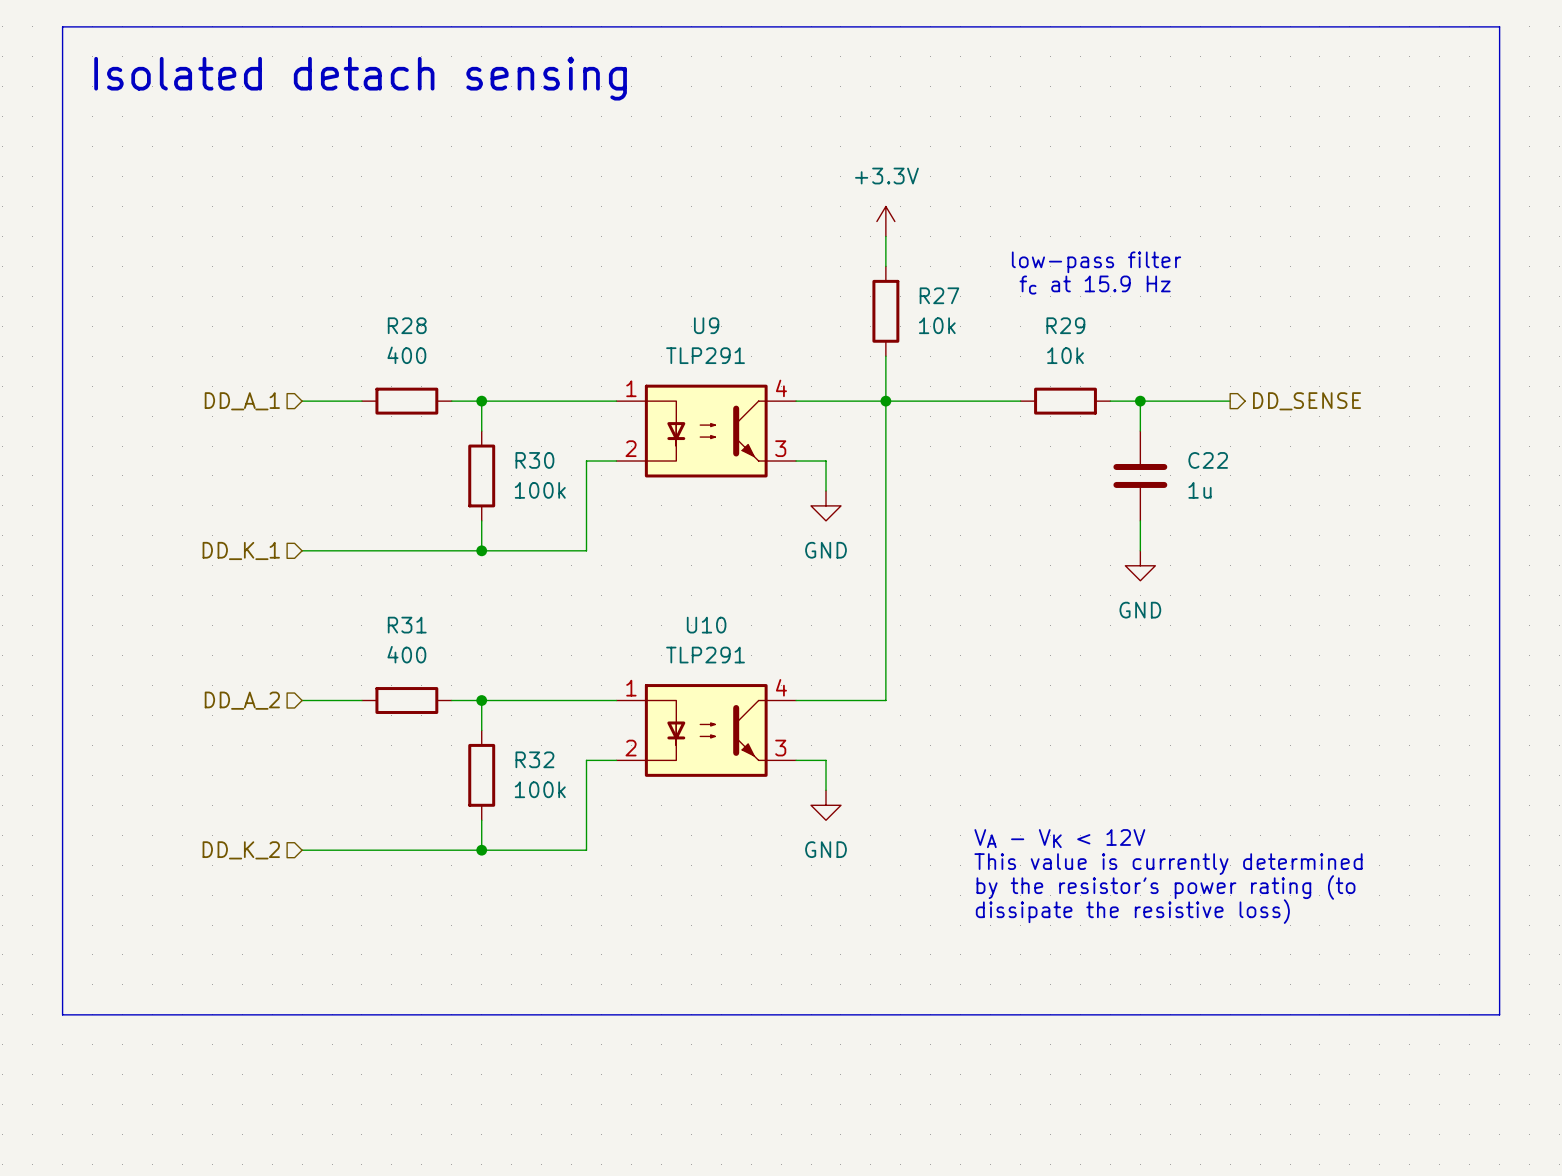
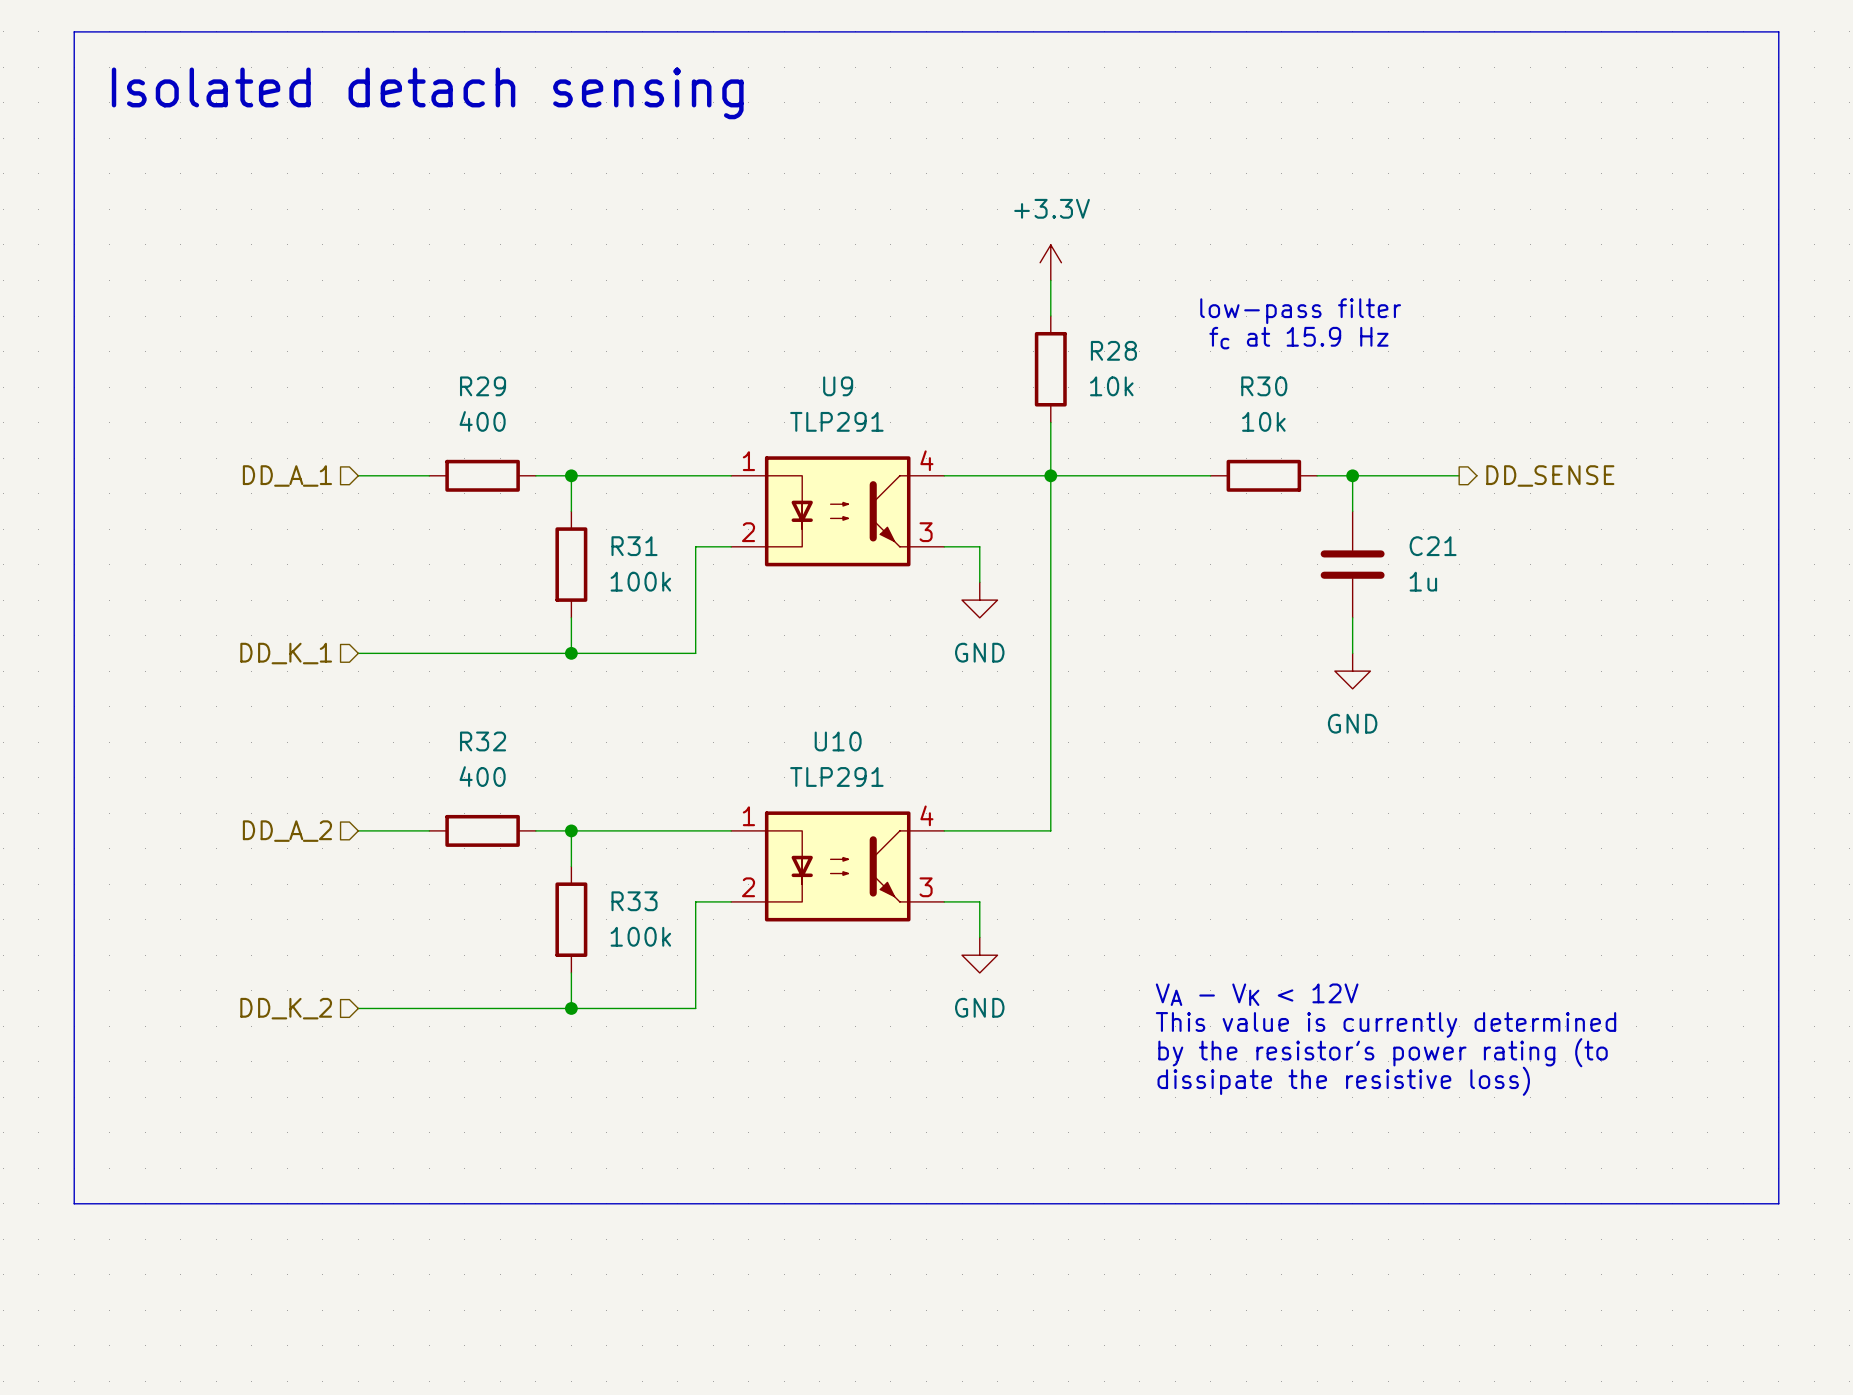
R27 name: R27 (939, 295) -> R28 (1113, 350)
R28 name: R28 (407, 325) -> R29 (483, 386)
R29 name: R29 (1065, 325) -> R30 (1264, 386)
R30 name: R30 (534, 460) -> R31 (634, 546)
C22 name: C22 (1208, 460) -> C21 (1433, 546)
R31 name: R31 (407, 625) -> R32 (483, 741)
R32 name: R32 (534, 759) -> R33 (634, 901)

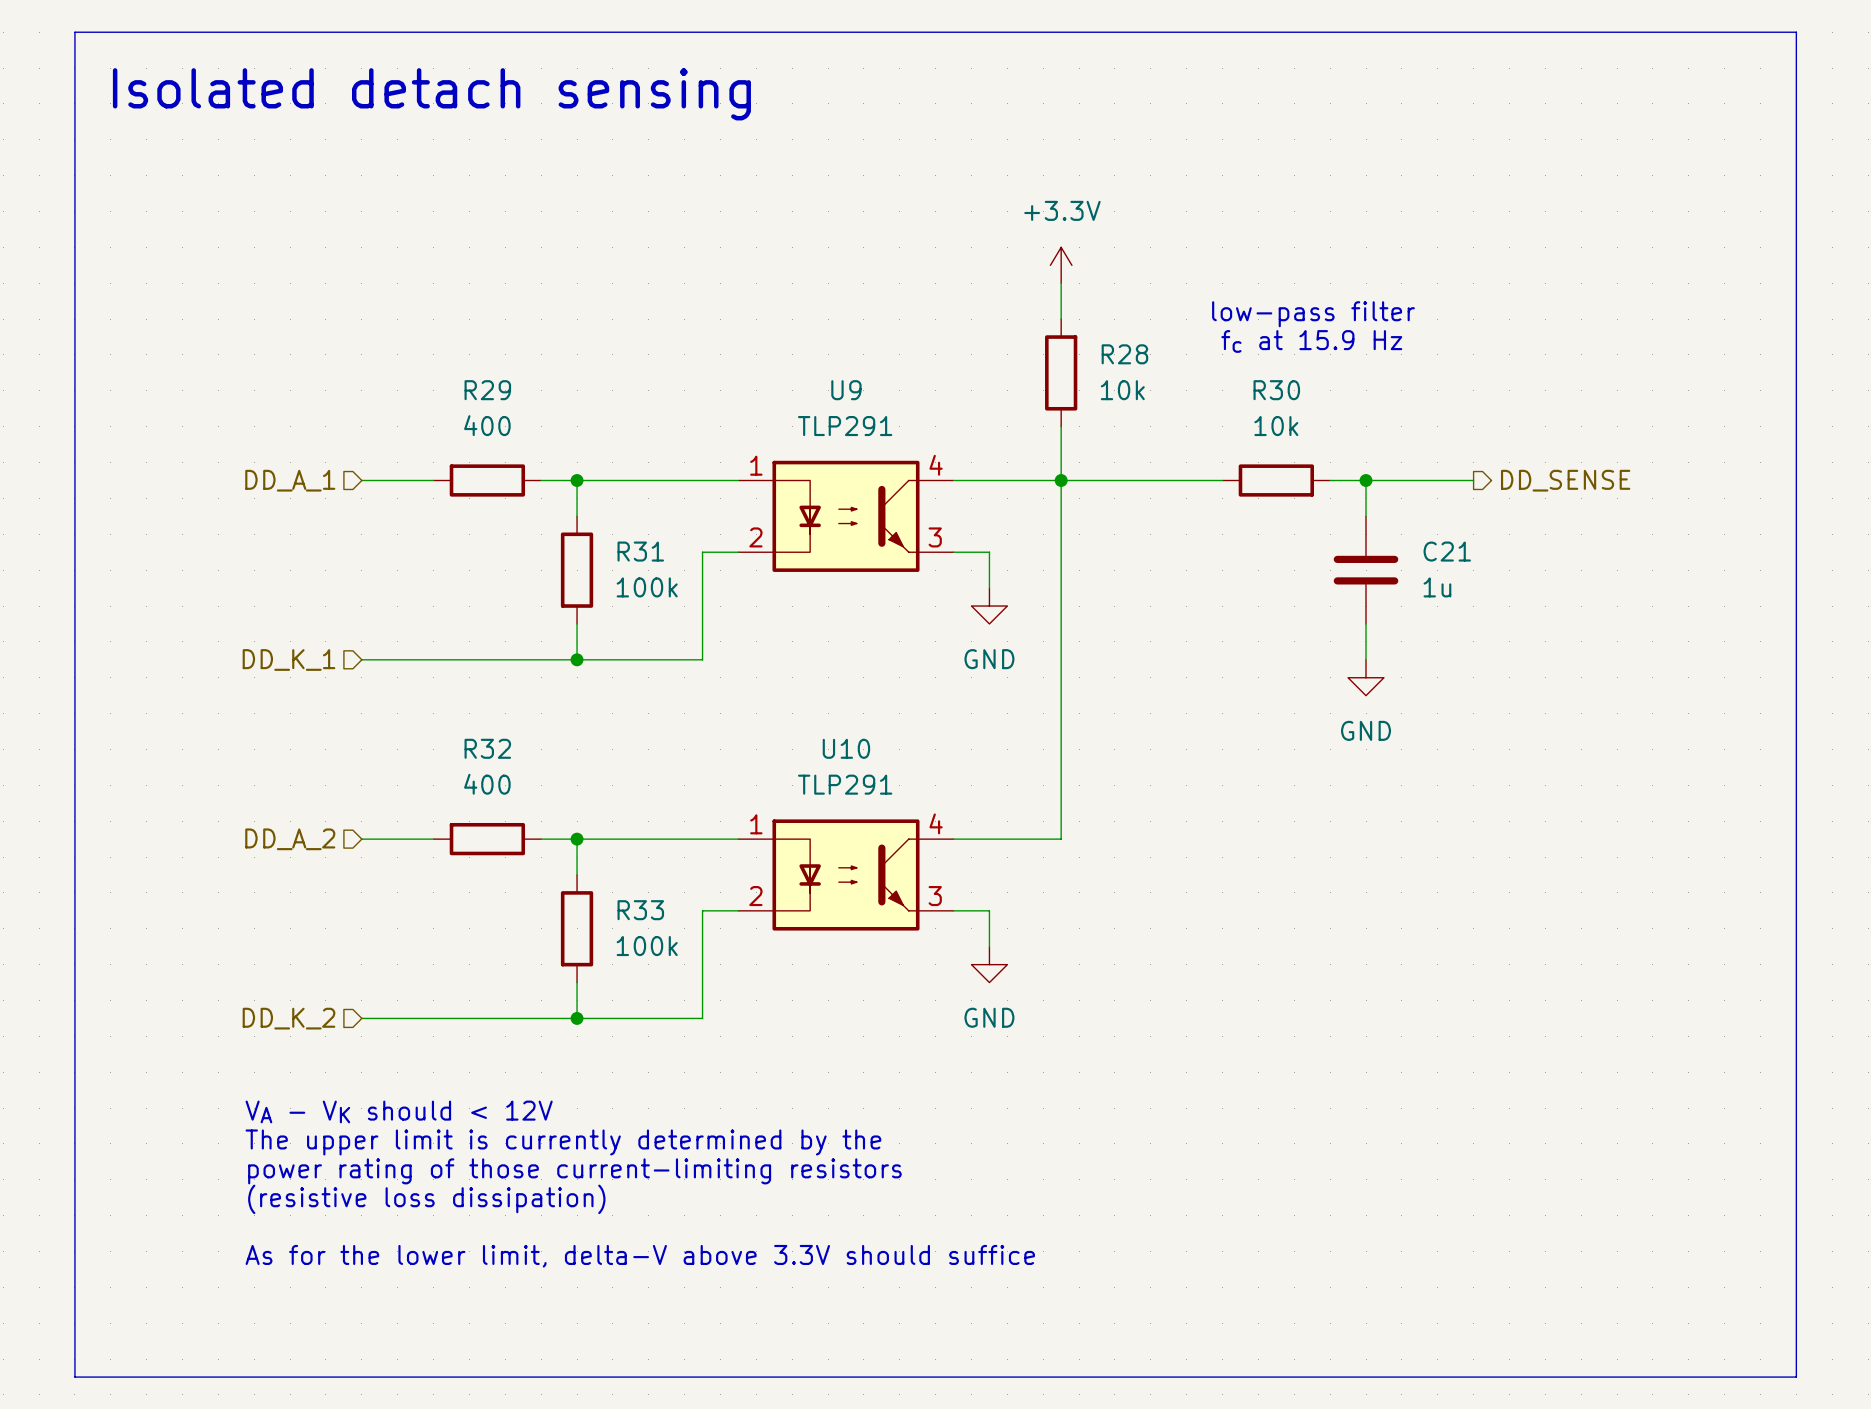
text: VA - VK < 12V (1257, 994) -> none
text: This value is currently determined (1386, 1024) -> none
text: by the resistor's power rating (to (1383, 1052) -> none
text: dissipate the resistive loss) (1343, 1081) -> none
text: none -> VA - VK should < 12V (399, 1111)
text: none -> The upper limit is currently determined by the (563, 1142)
text: none -> power rating of those current-limiting resistors (574, 1171)
text: none -> (resistive loss dissipation) (426, 1199)
line: (74, 1203) (1778, 1203) -> (74, 1215) (74, 1377) (1796, 1377) (1796, 1215)
text: none -> As for the lower limit, delta-V above 3.3V should suffice (640, 1256)

